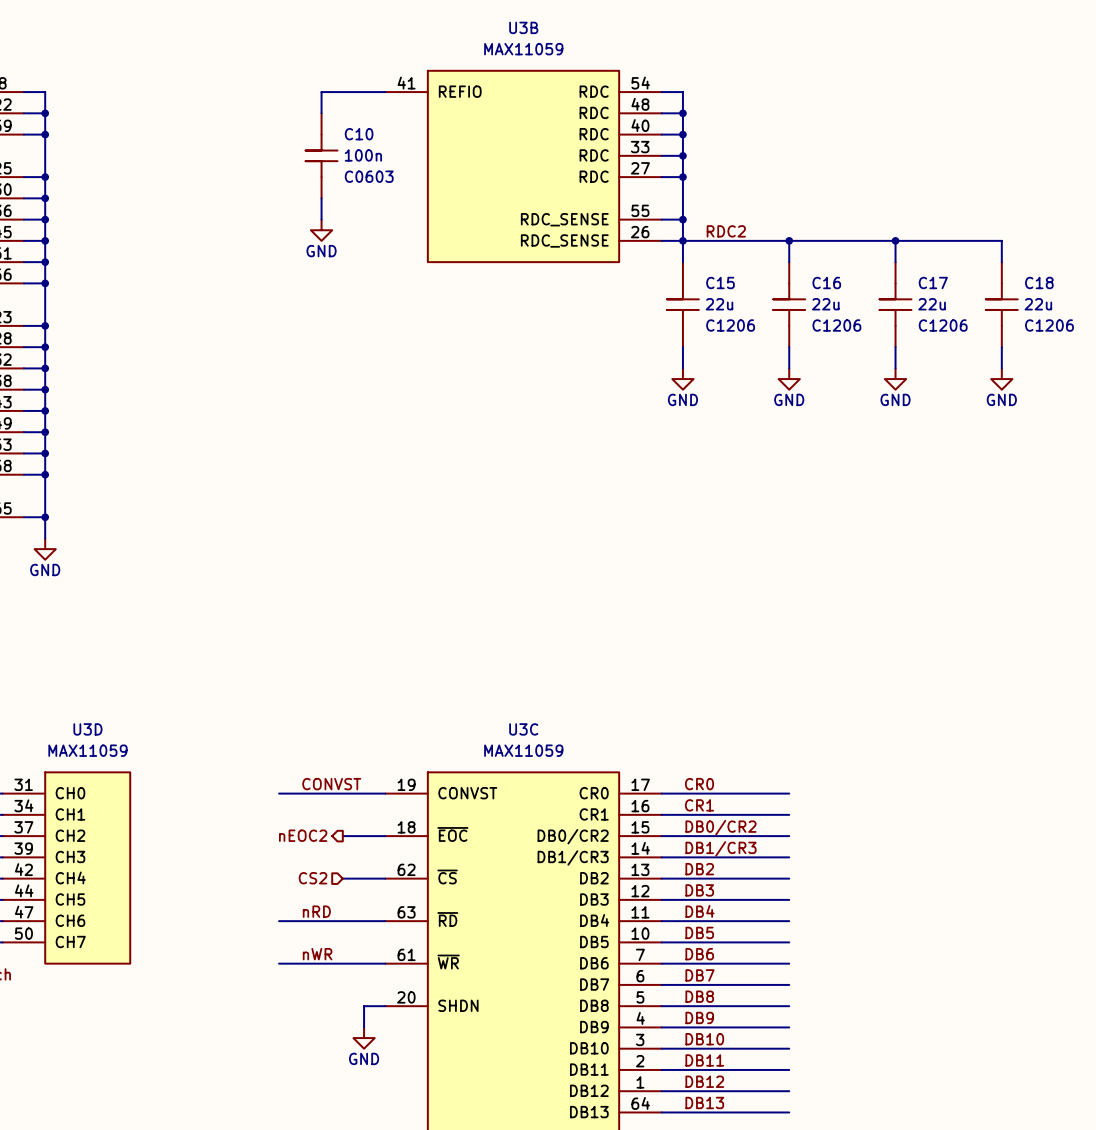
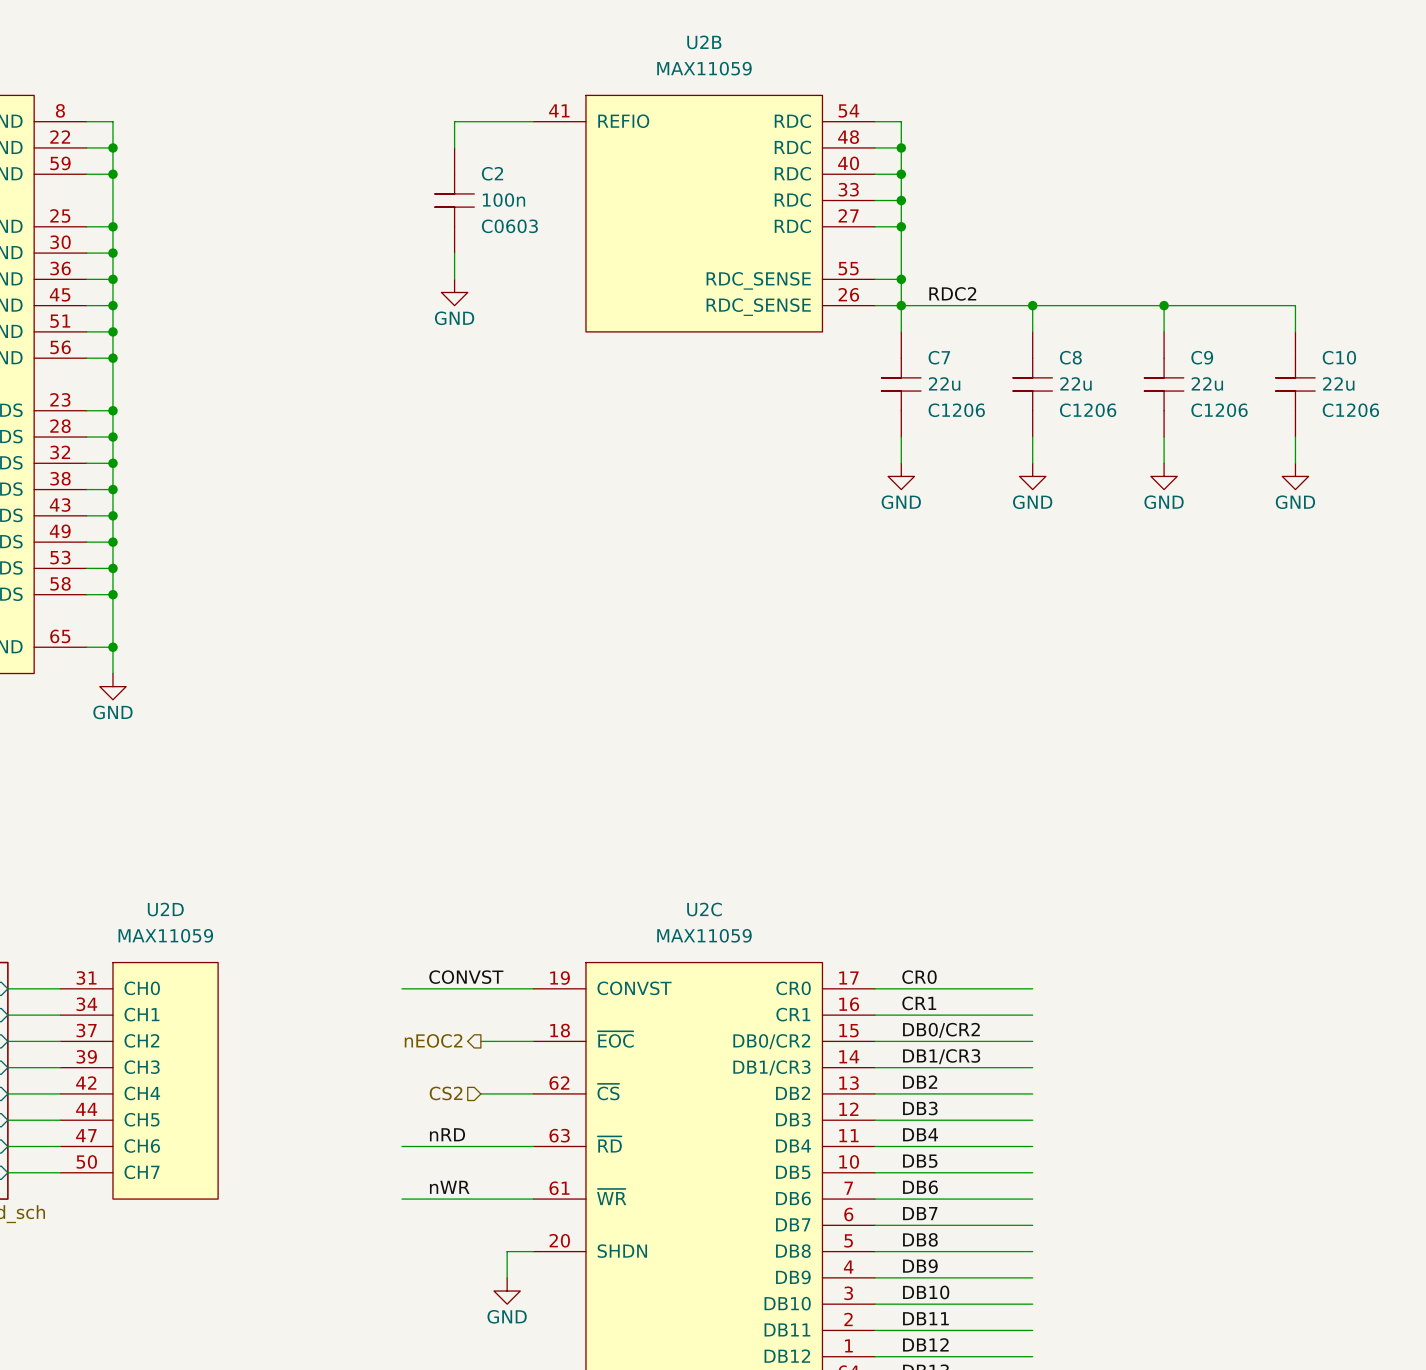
U3B name: U3B (523, 27) -> U2B (704, 42)
C10 name: C10 (359, 134) -> C2 (492, 173)
C15 name: C15 (720, 282) -> C7 (939, 357)
C16 name: C16 (826, 282) -> C8 (1070, 357)
C17 name: C17 (933, 282) -> C9 (1202, 357)
C18 name: C18 (1039, 282) -> C10 (1339, 357)
U3D name: U3D (87, 729) -> U2D (165, 909)
U3C name: U3C (523, 729) -> U2C (704, 909)

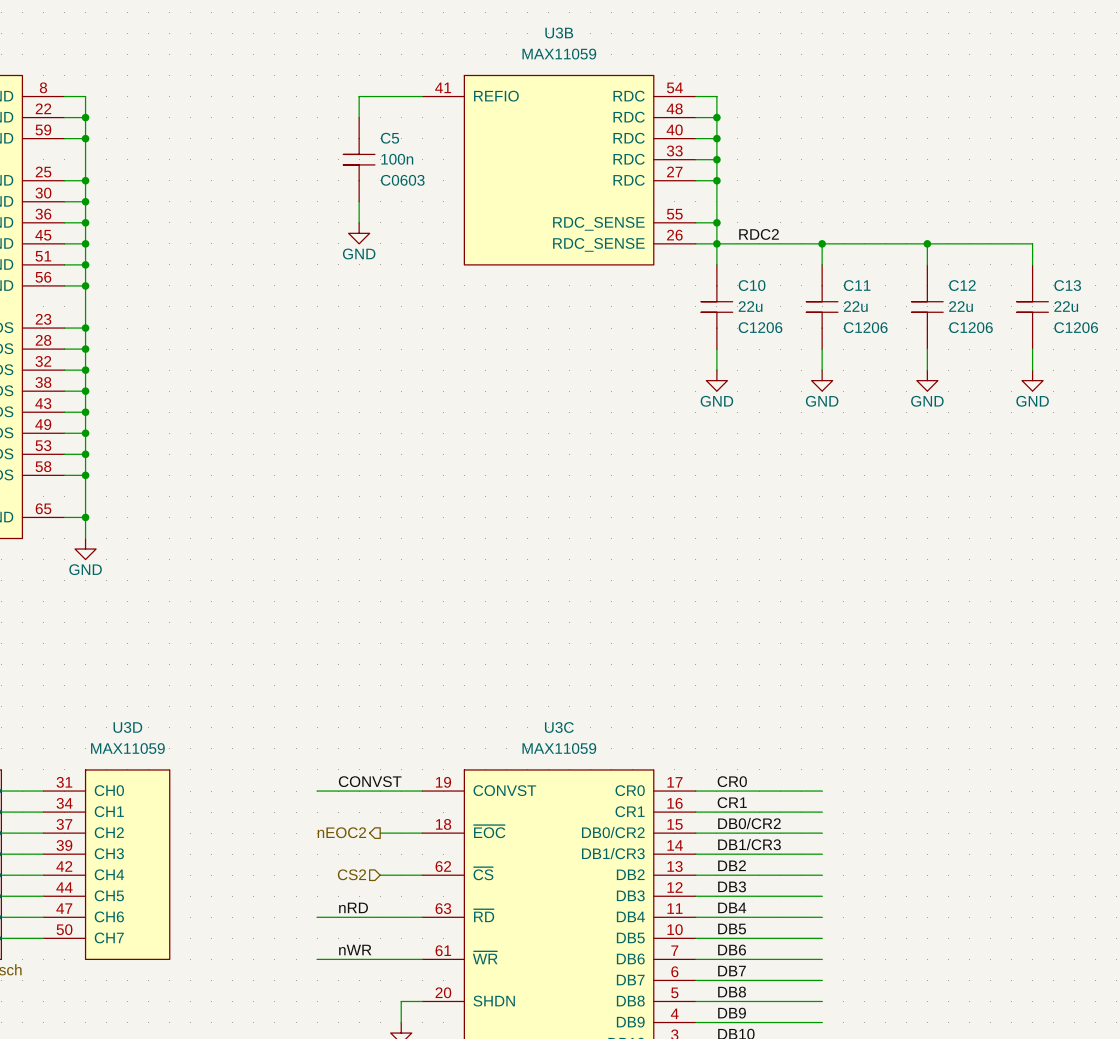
U2B name: U2B (704, 42) -> U3B (559, 33)
C2 name: C2 (492, 173) -> C5 (390, 138)
C7 name: C7 (939, 357) -> C10 (752, 285)
C8 name: C8 (1070, 357) -> C11 (857, 285)
C9 name: C9 (1202, 357) -> C12 (962, 285)
C10 name: C10 (1339, 357) -> C13 (1067, 285)
U2D name: U2D (165, 909) -> U3D (127, 727)
U2C name: U2C (704, 909) -> U3C (559, 727)

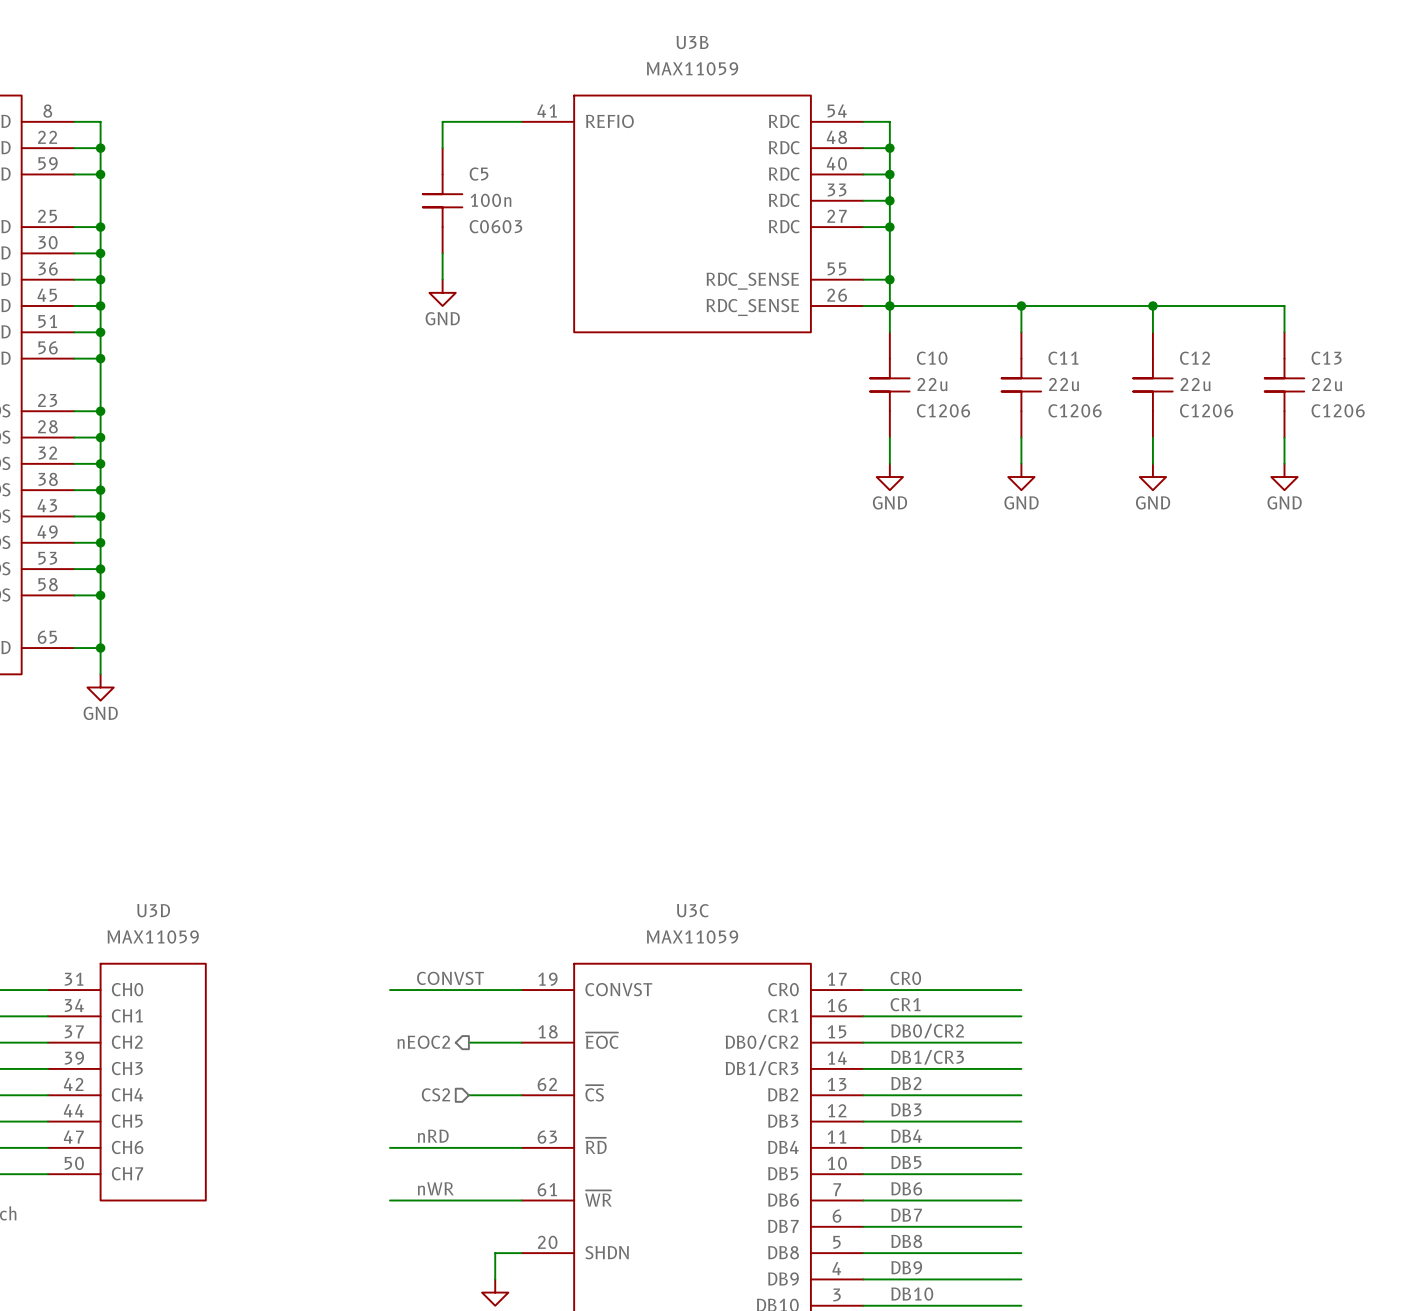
label: RDC2 (759, 234) -> none

